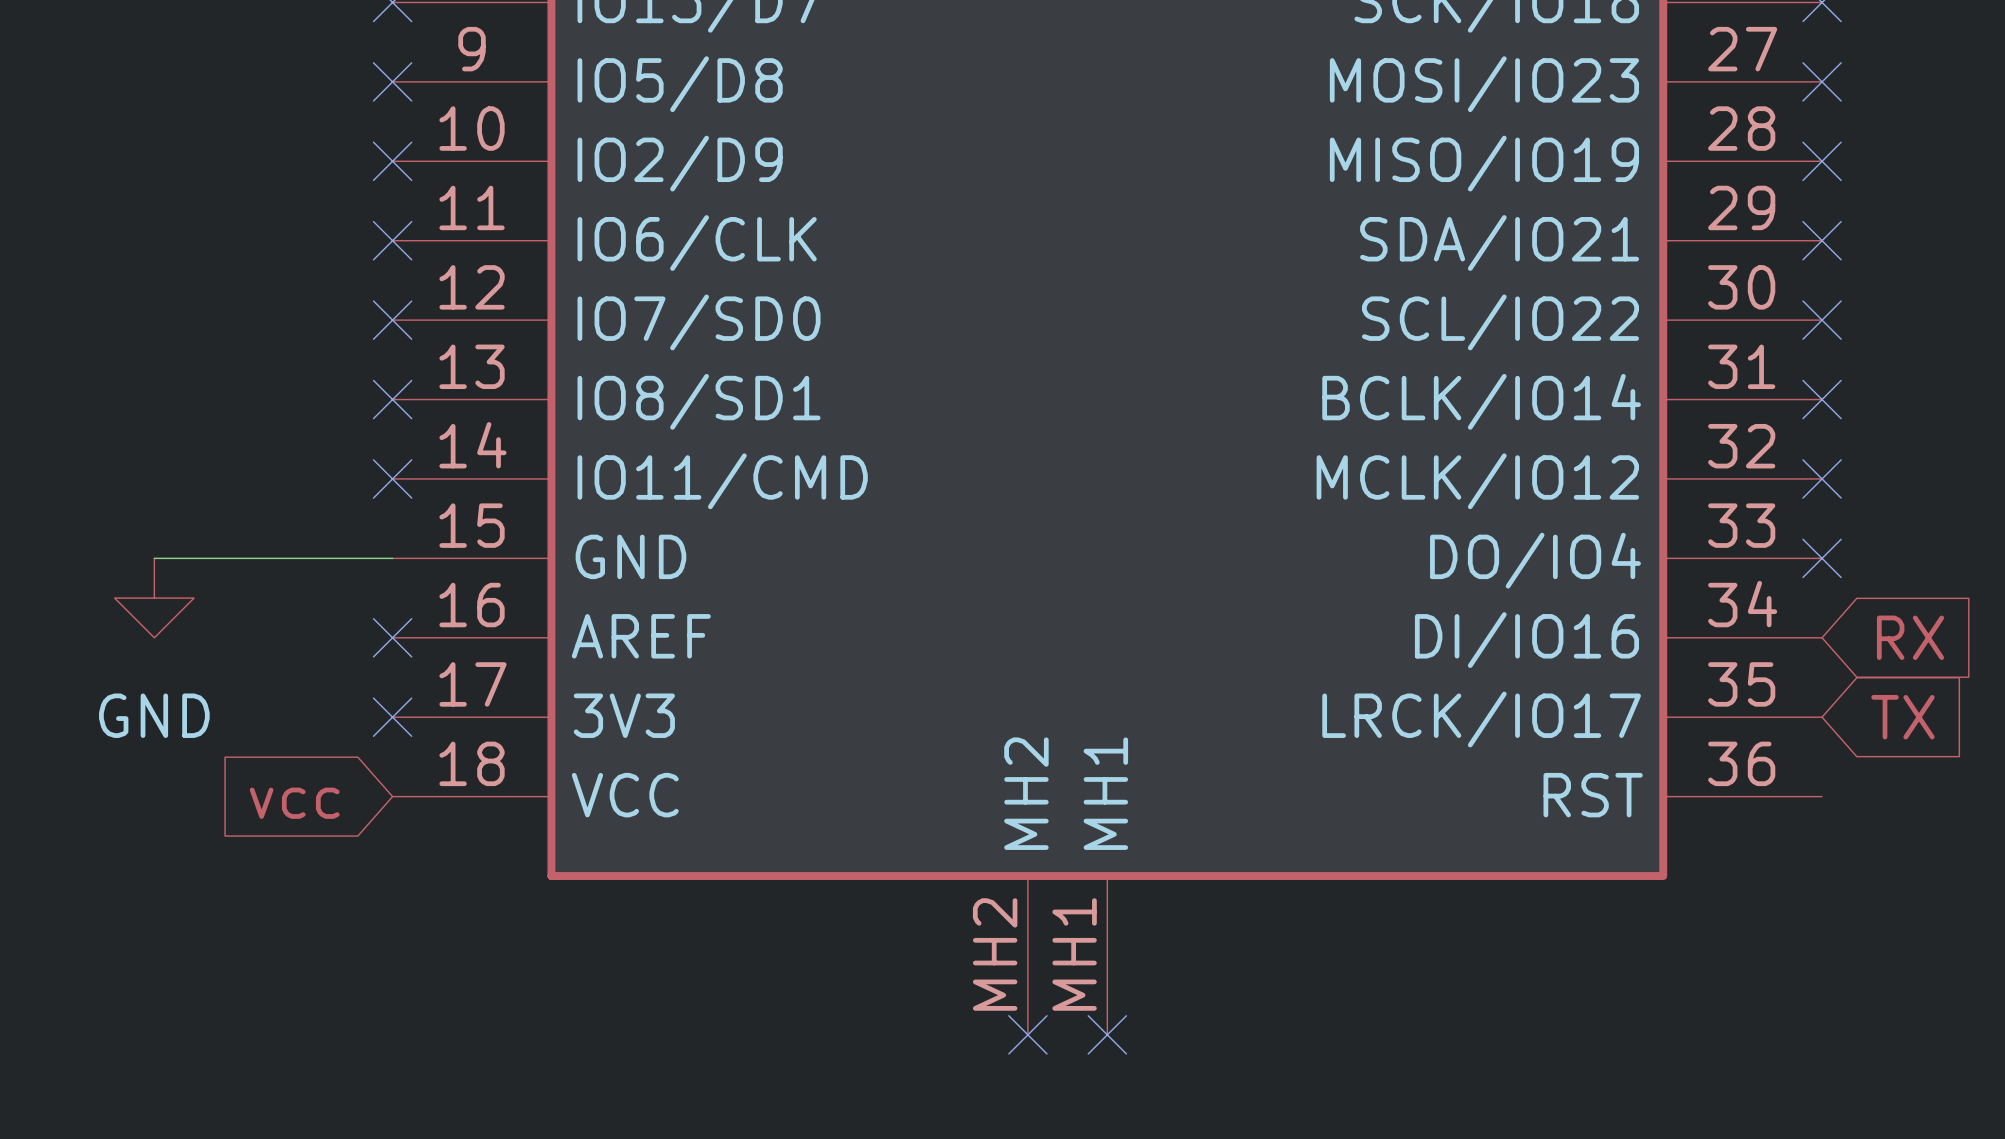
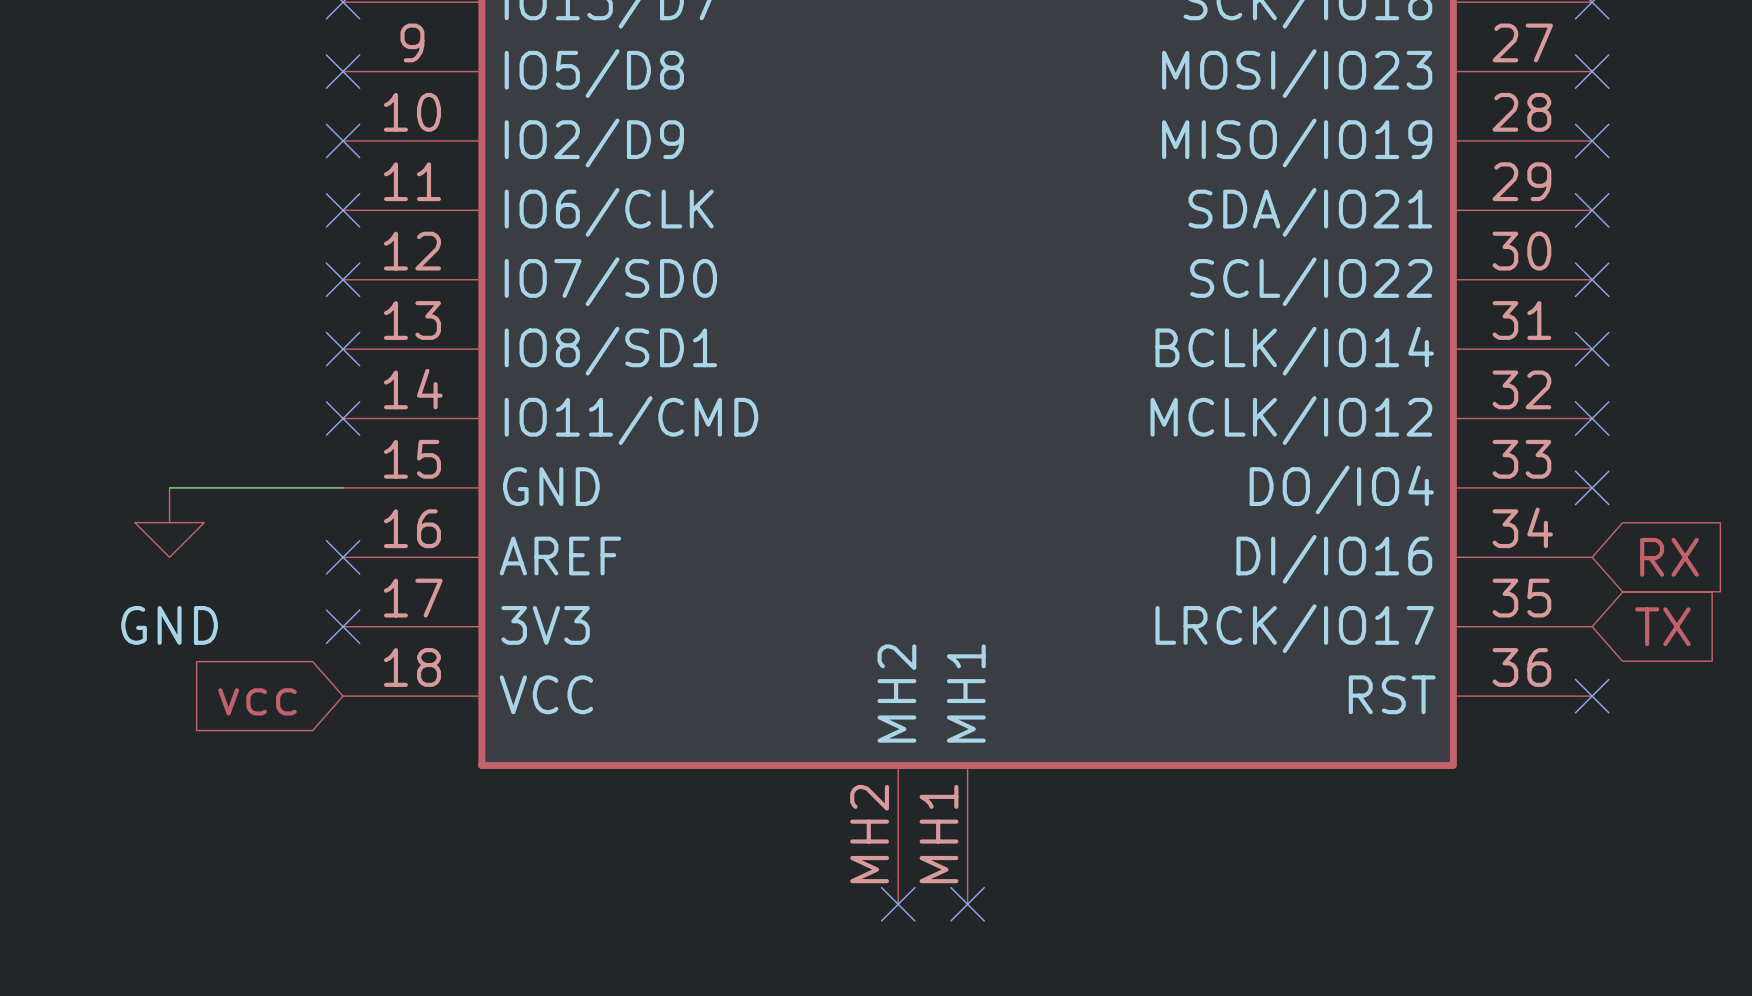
wire: (154, 558) (194, 558) -> none
power symbol position: GND (154, 598) -> GND (169, 522)
no-connect mark: none -> (1592, 696)

